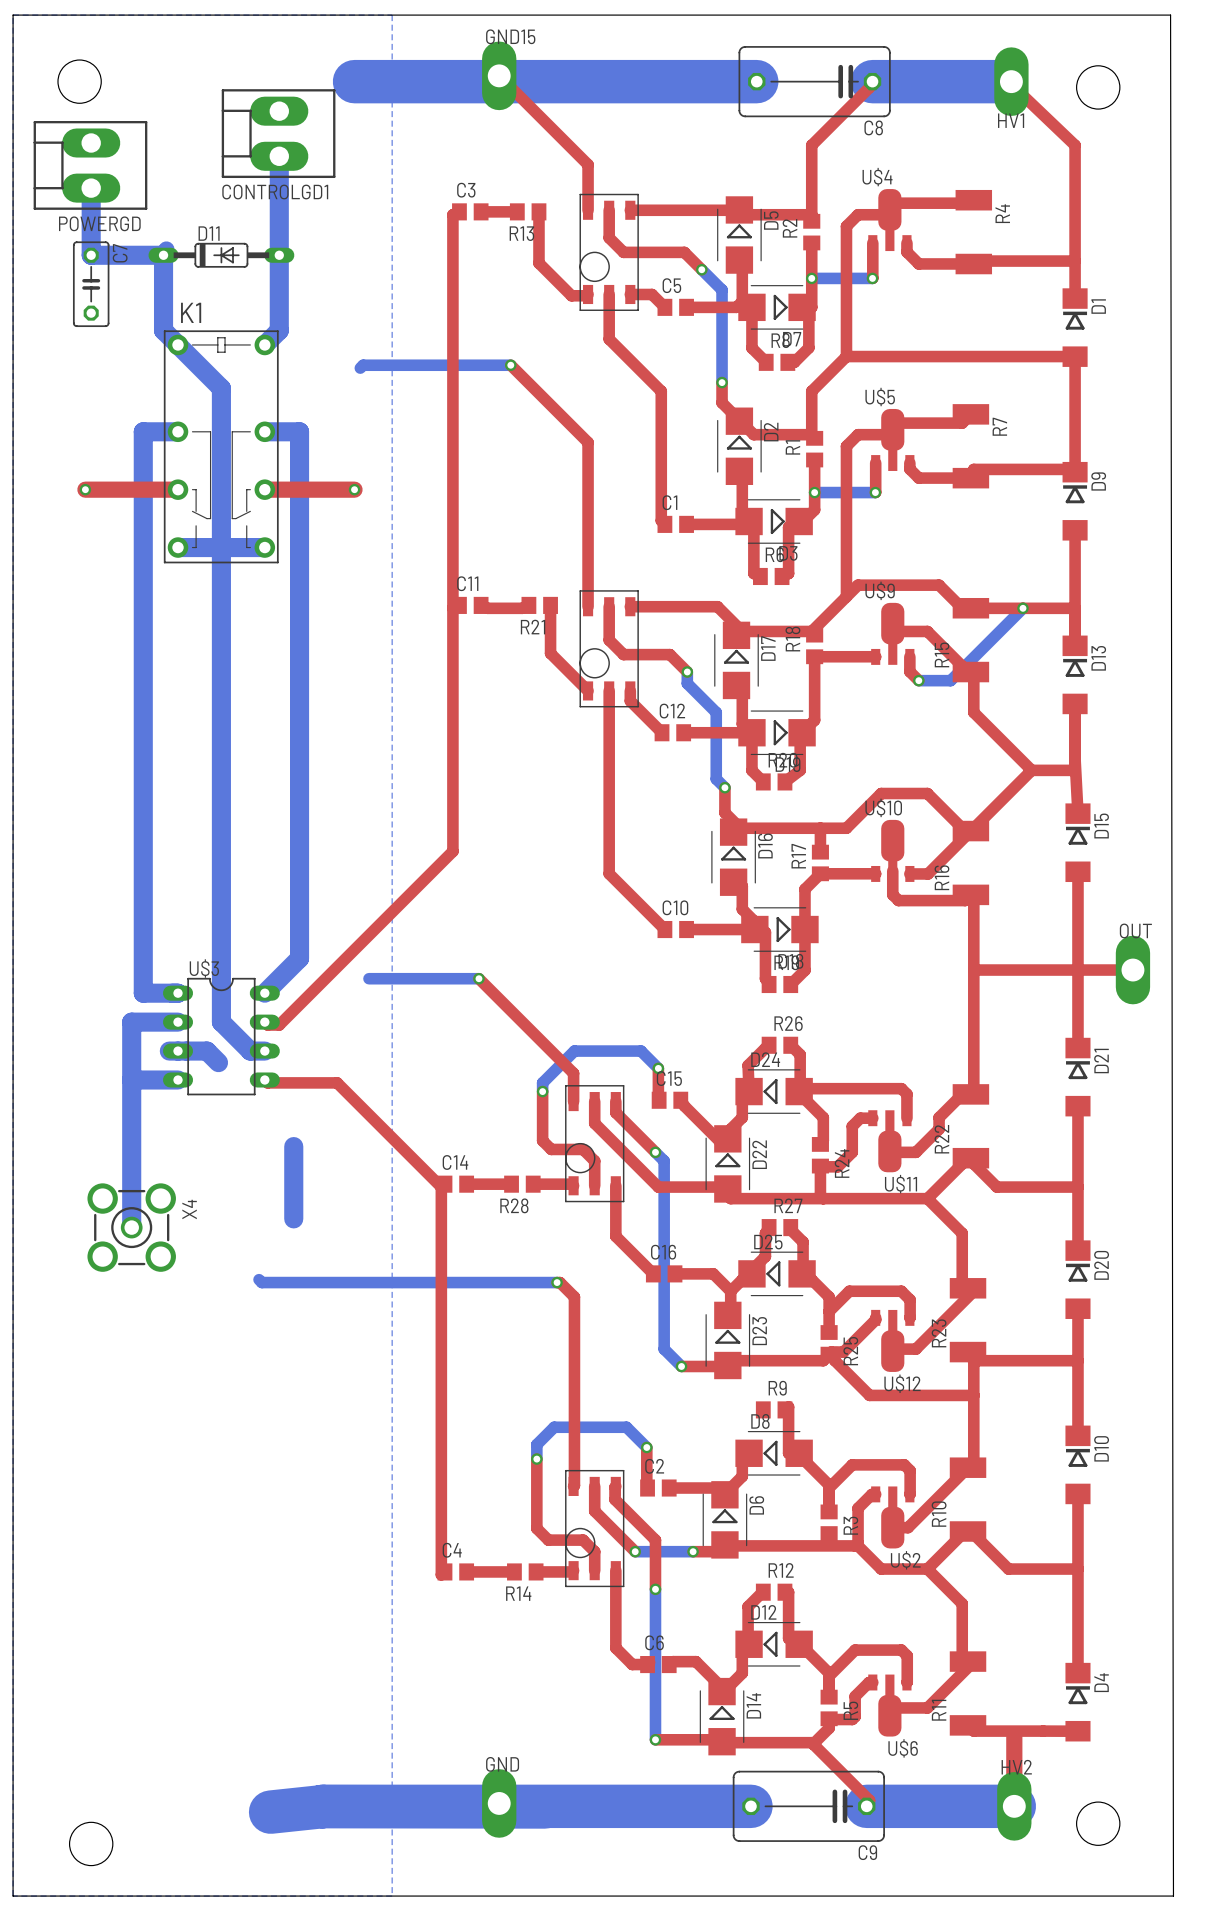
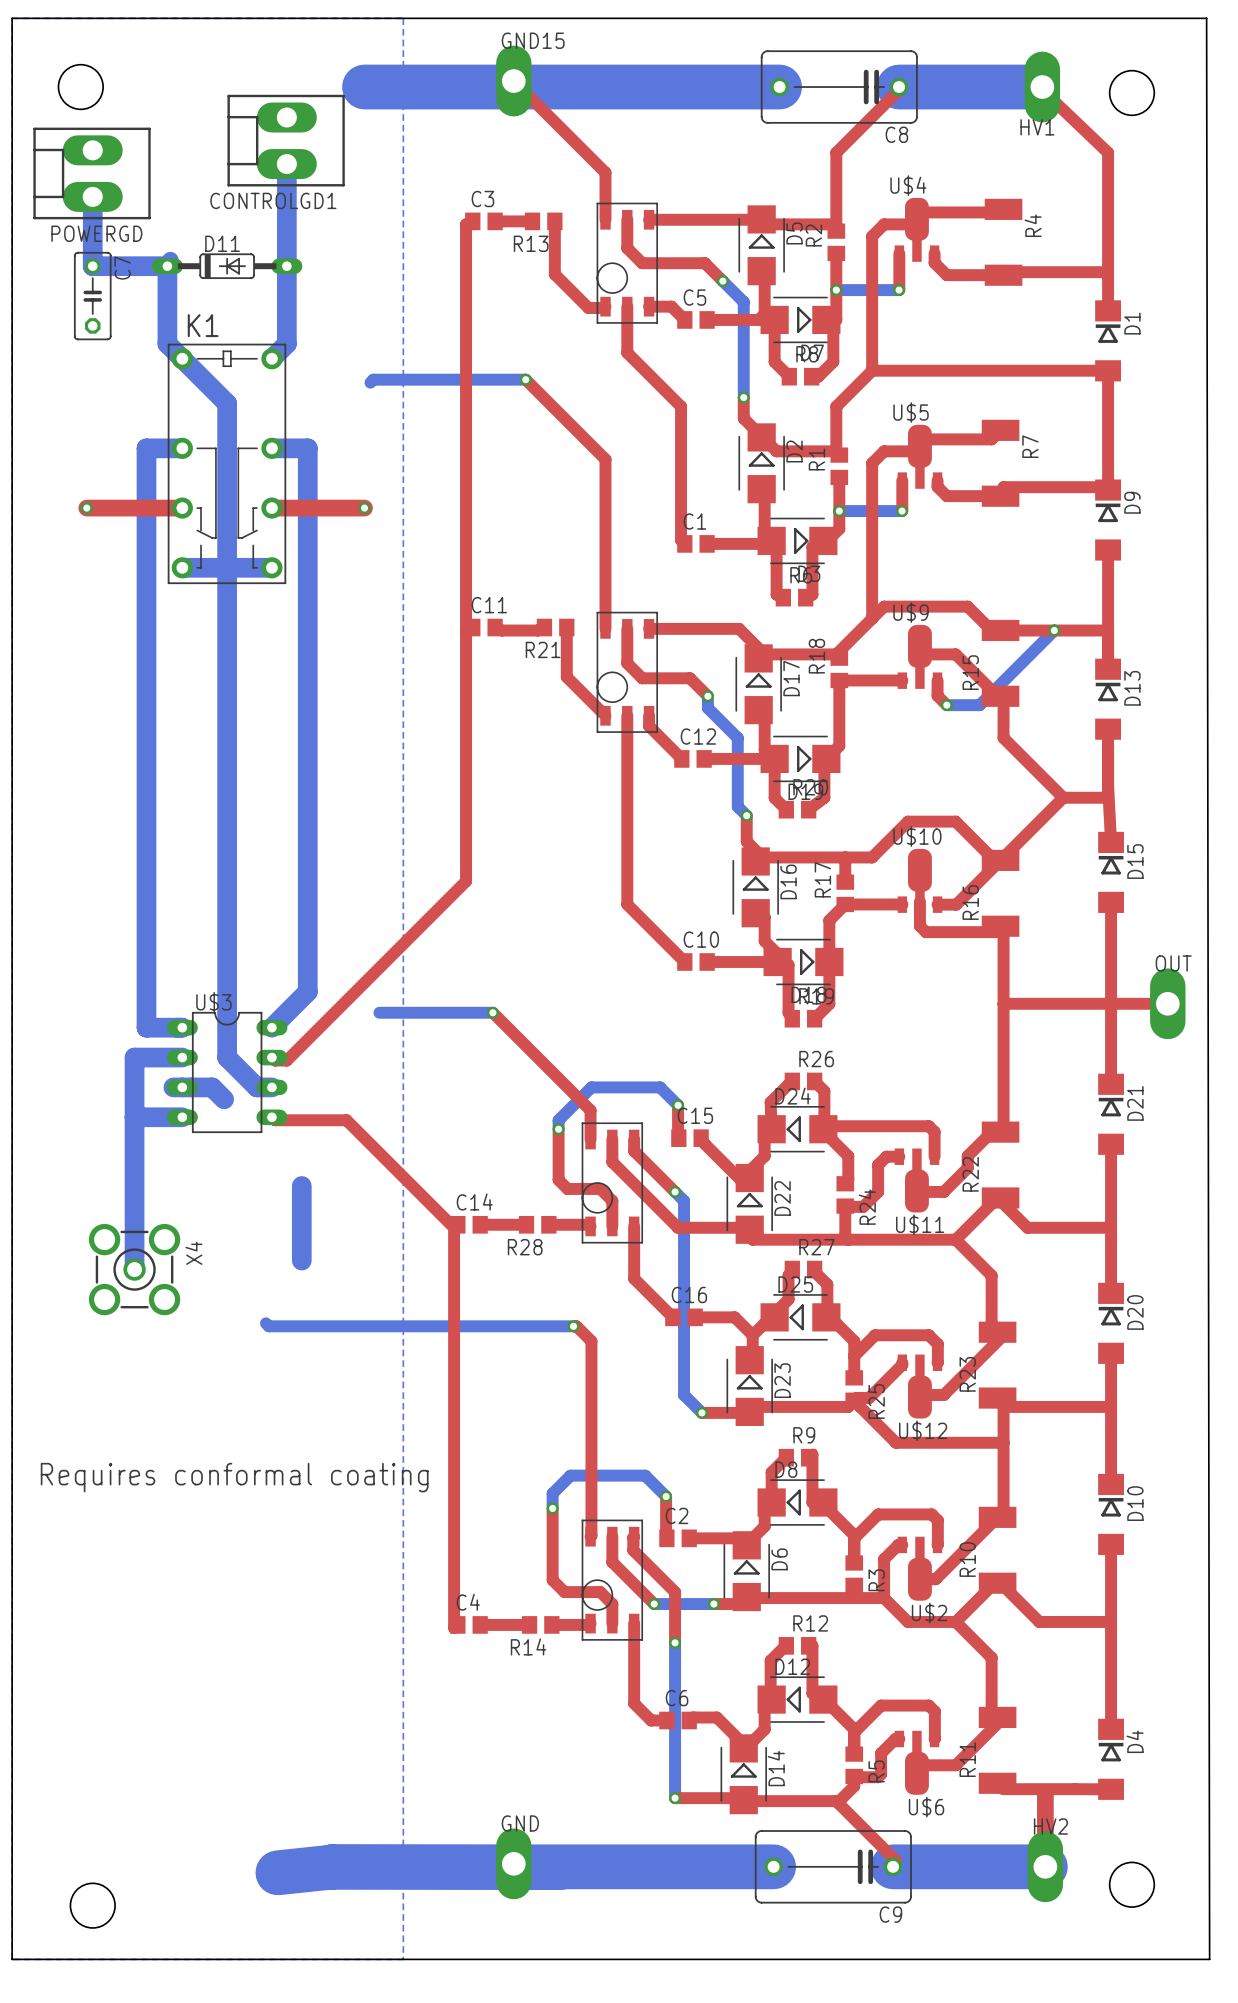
top track: none -> (786, 1457) (771, 1472) (771, 1502)
text: none -> Requires conformal coating (234, 1477)

